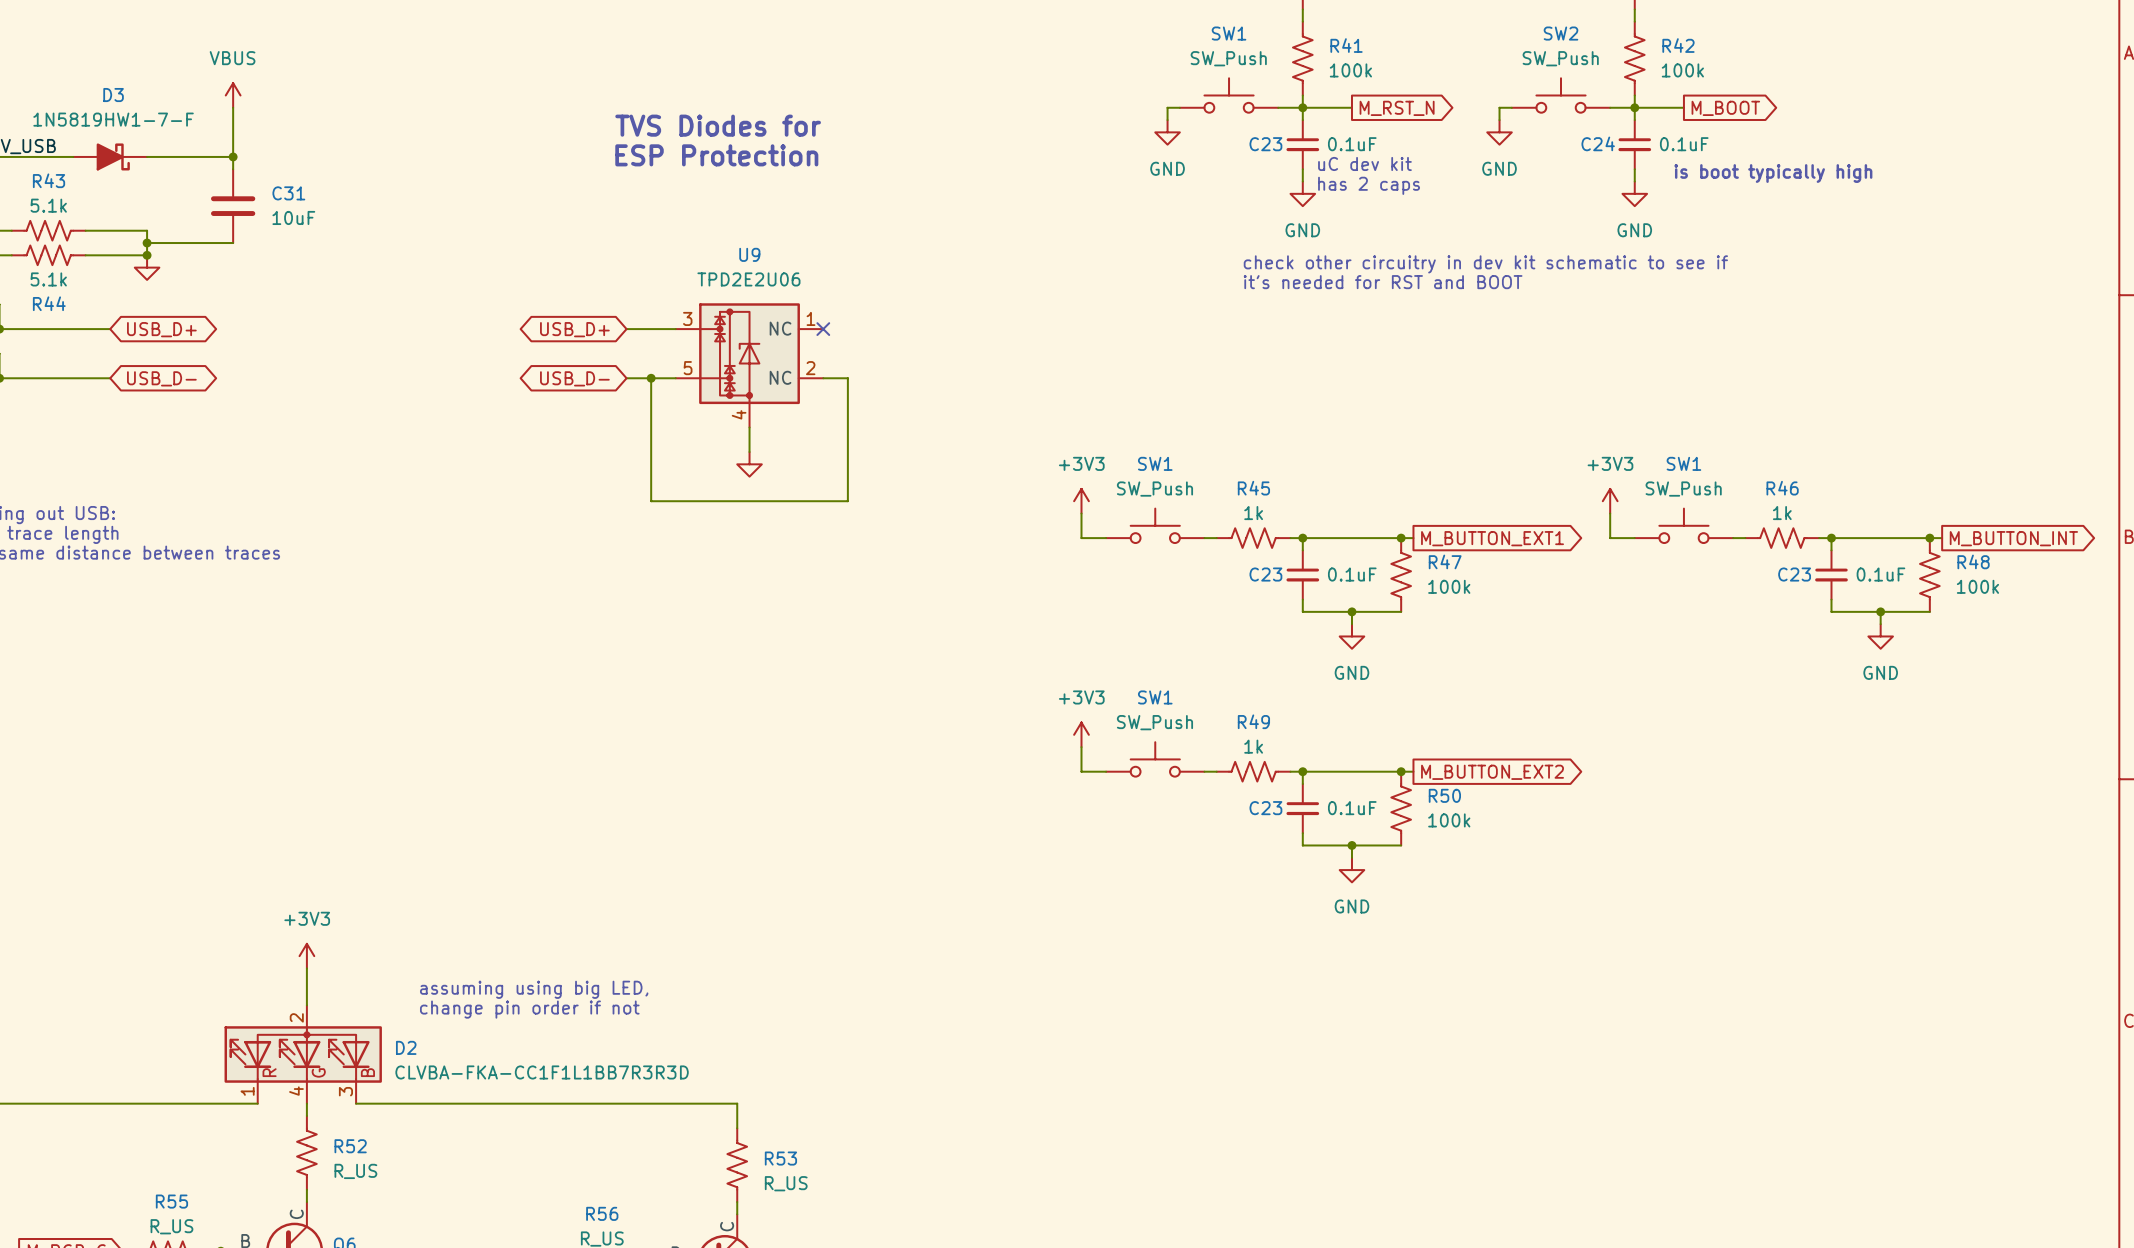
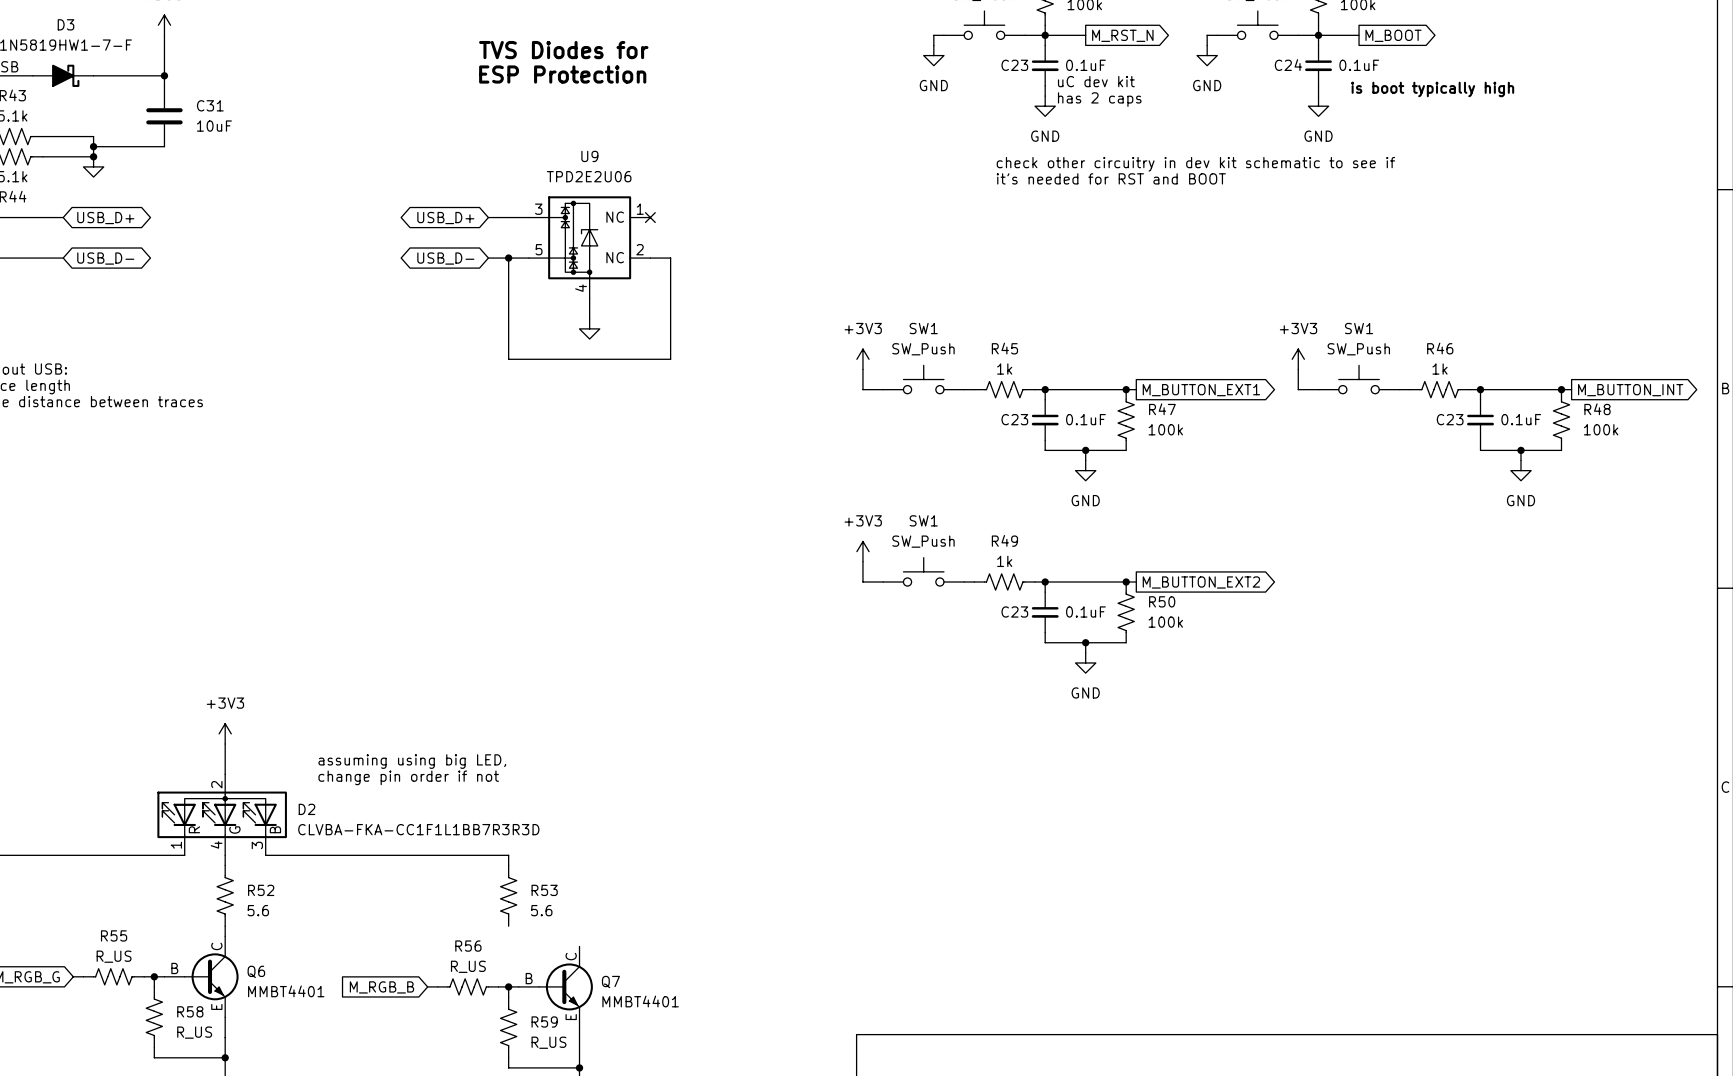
wire: (651, 1103) (737, 1103) (737, 1128) -> (508, 855) (508, 865)
R53 position: (737, 1165) -> (508, 895)
R52 value: R_US (355, 1171) -> 5.6 (258, 910)
R53 value: R_US (786, 1183) -> 5.6 (541, 910)
wire: (737, 1202) (737, 1214) -> none

